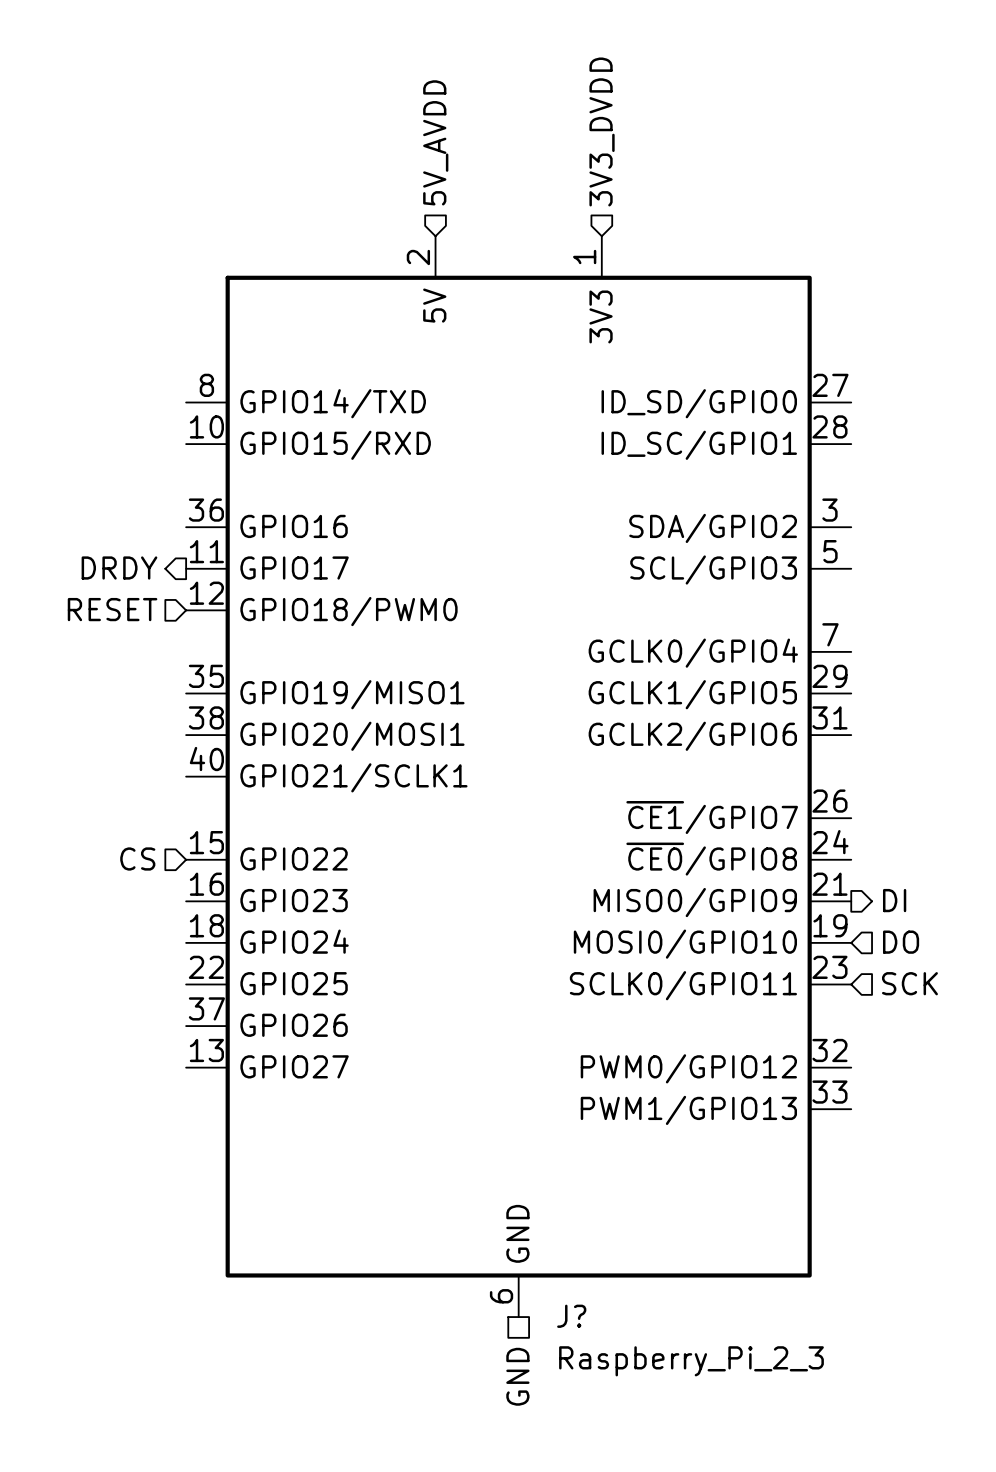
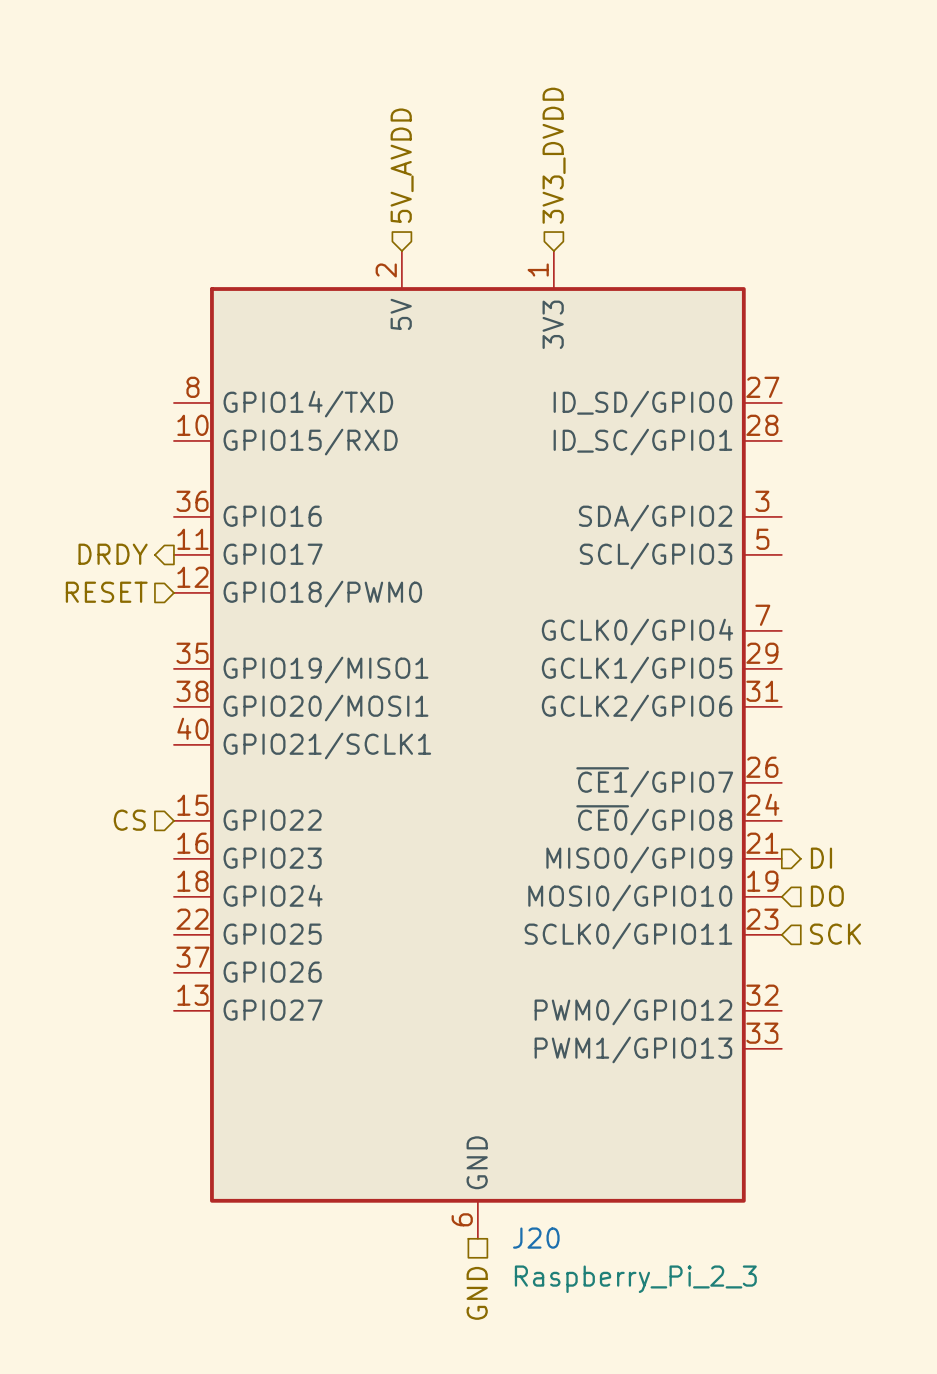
J? name: J? (571, 1316) -> J20 (536, 1238)

